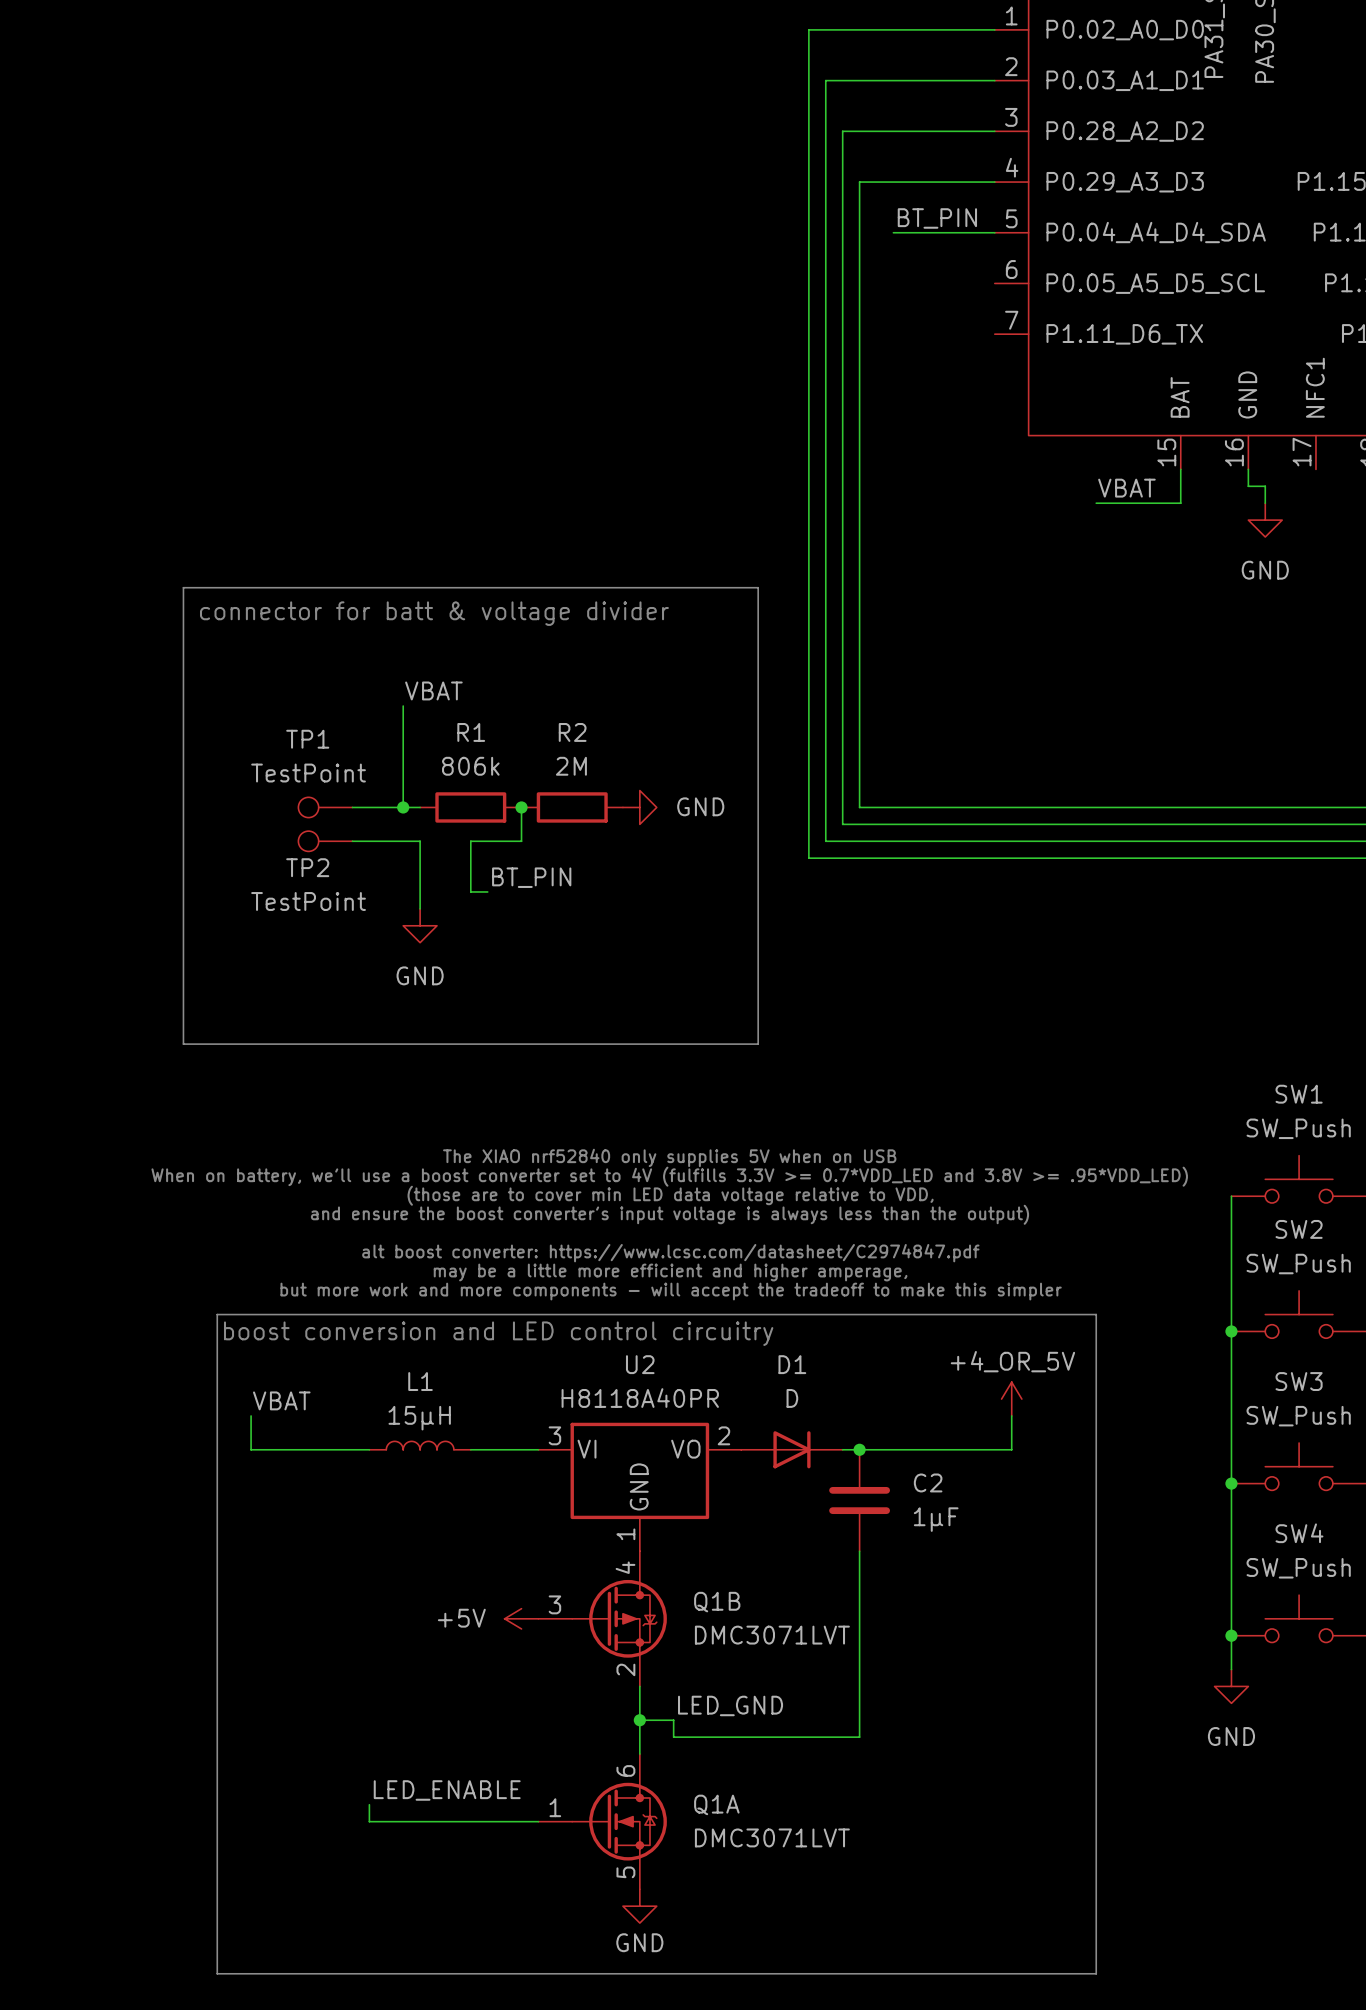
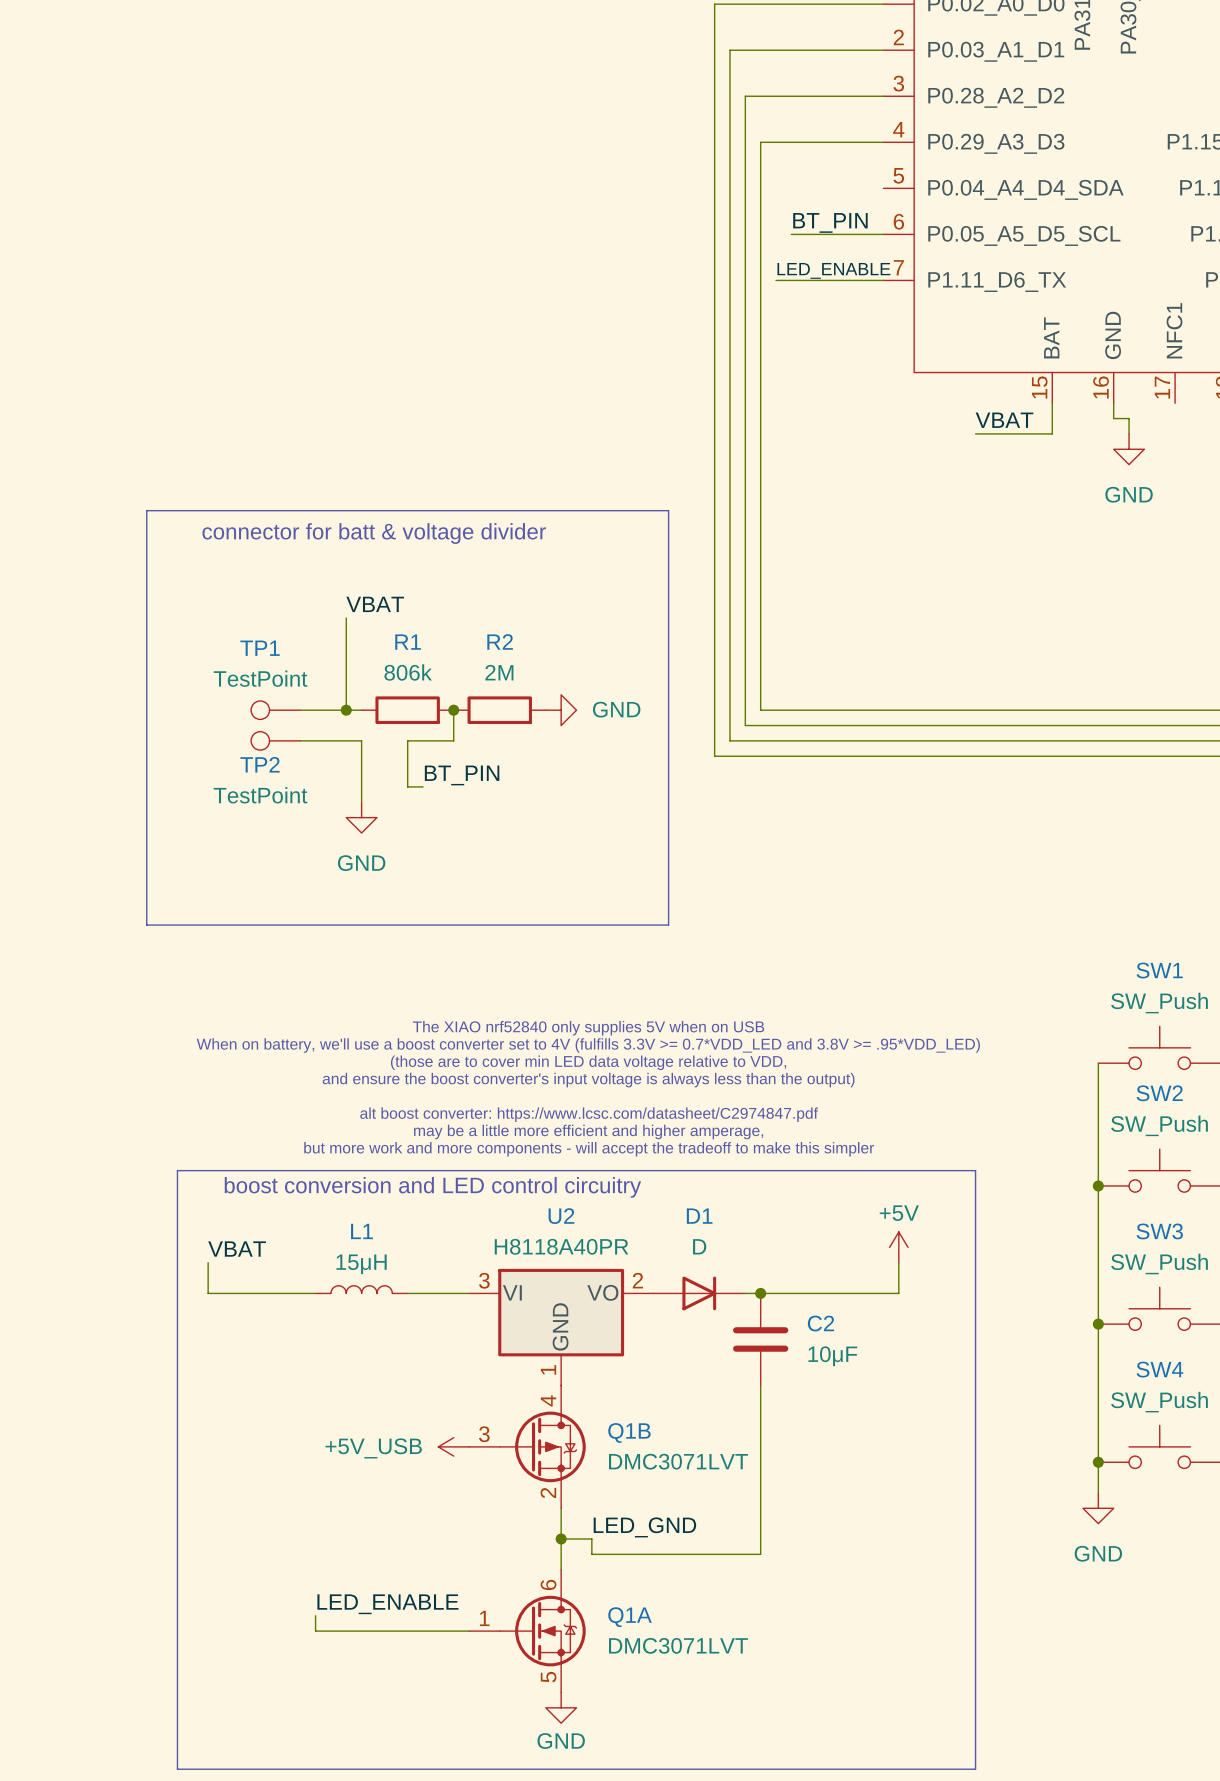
label position: BT_PIN (937, 218) -> BT_PIN (830, 222)
wire: (893, 232) (994, 232) -> (791, 234) (883, 234)
label: none -> LED_ENABLE (833, 270)
wire: none -> (776, 280) (883, 280)
power symbol: +4_OR_5V (1011, 1399) -> +5V (898, 1247)
C2 value: 1μF (936, 1519) -> 10μF (832, 1356)
power symbol: +5V (521, 1618) -> +5V_USB (453, 1446)

